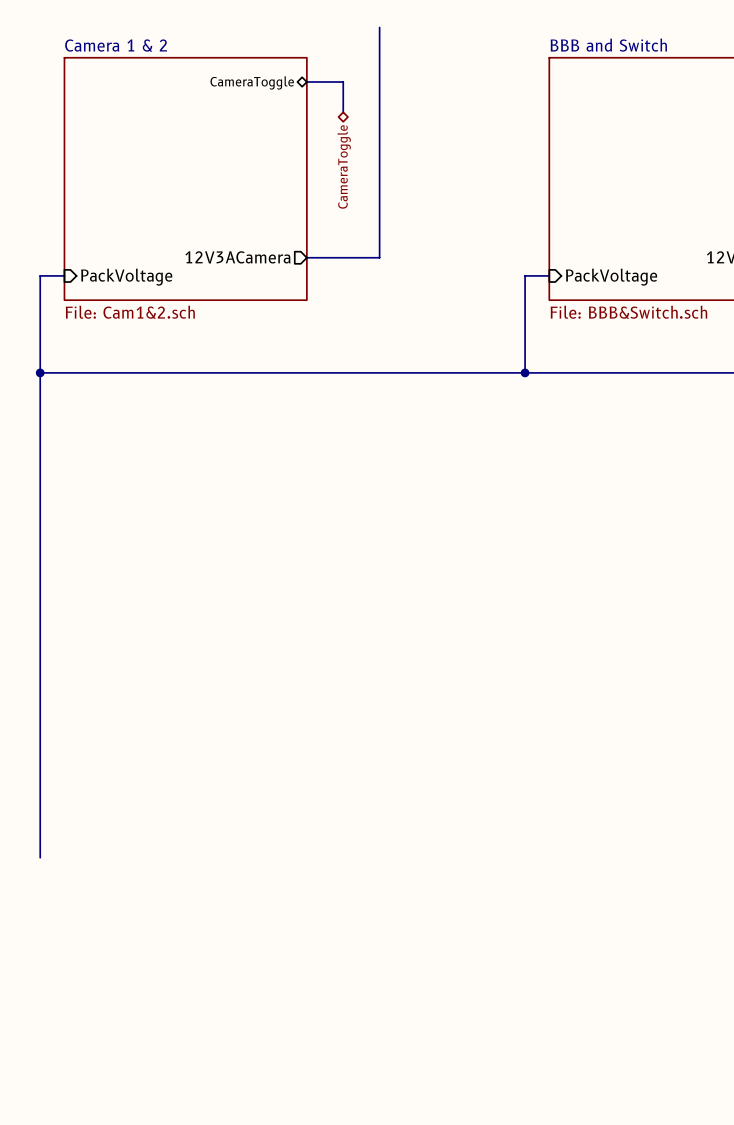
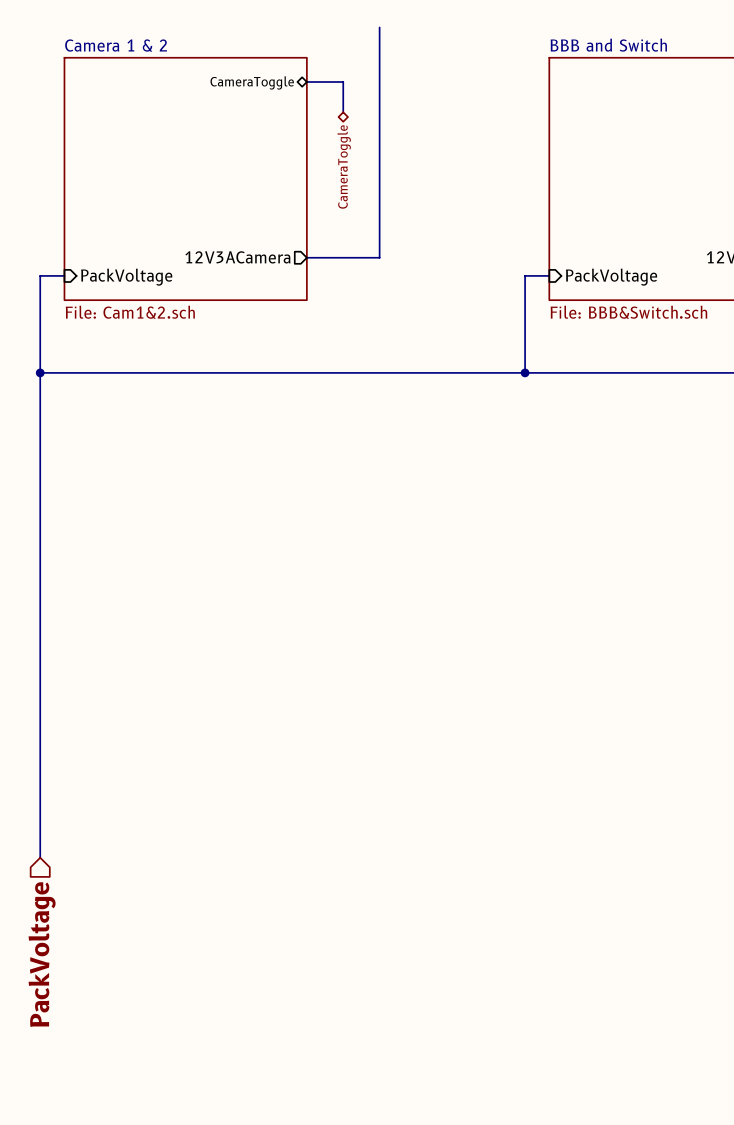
hierarchical label: none -> PackVoltage (42, 954)

